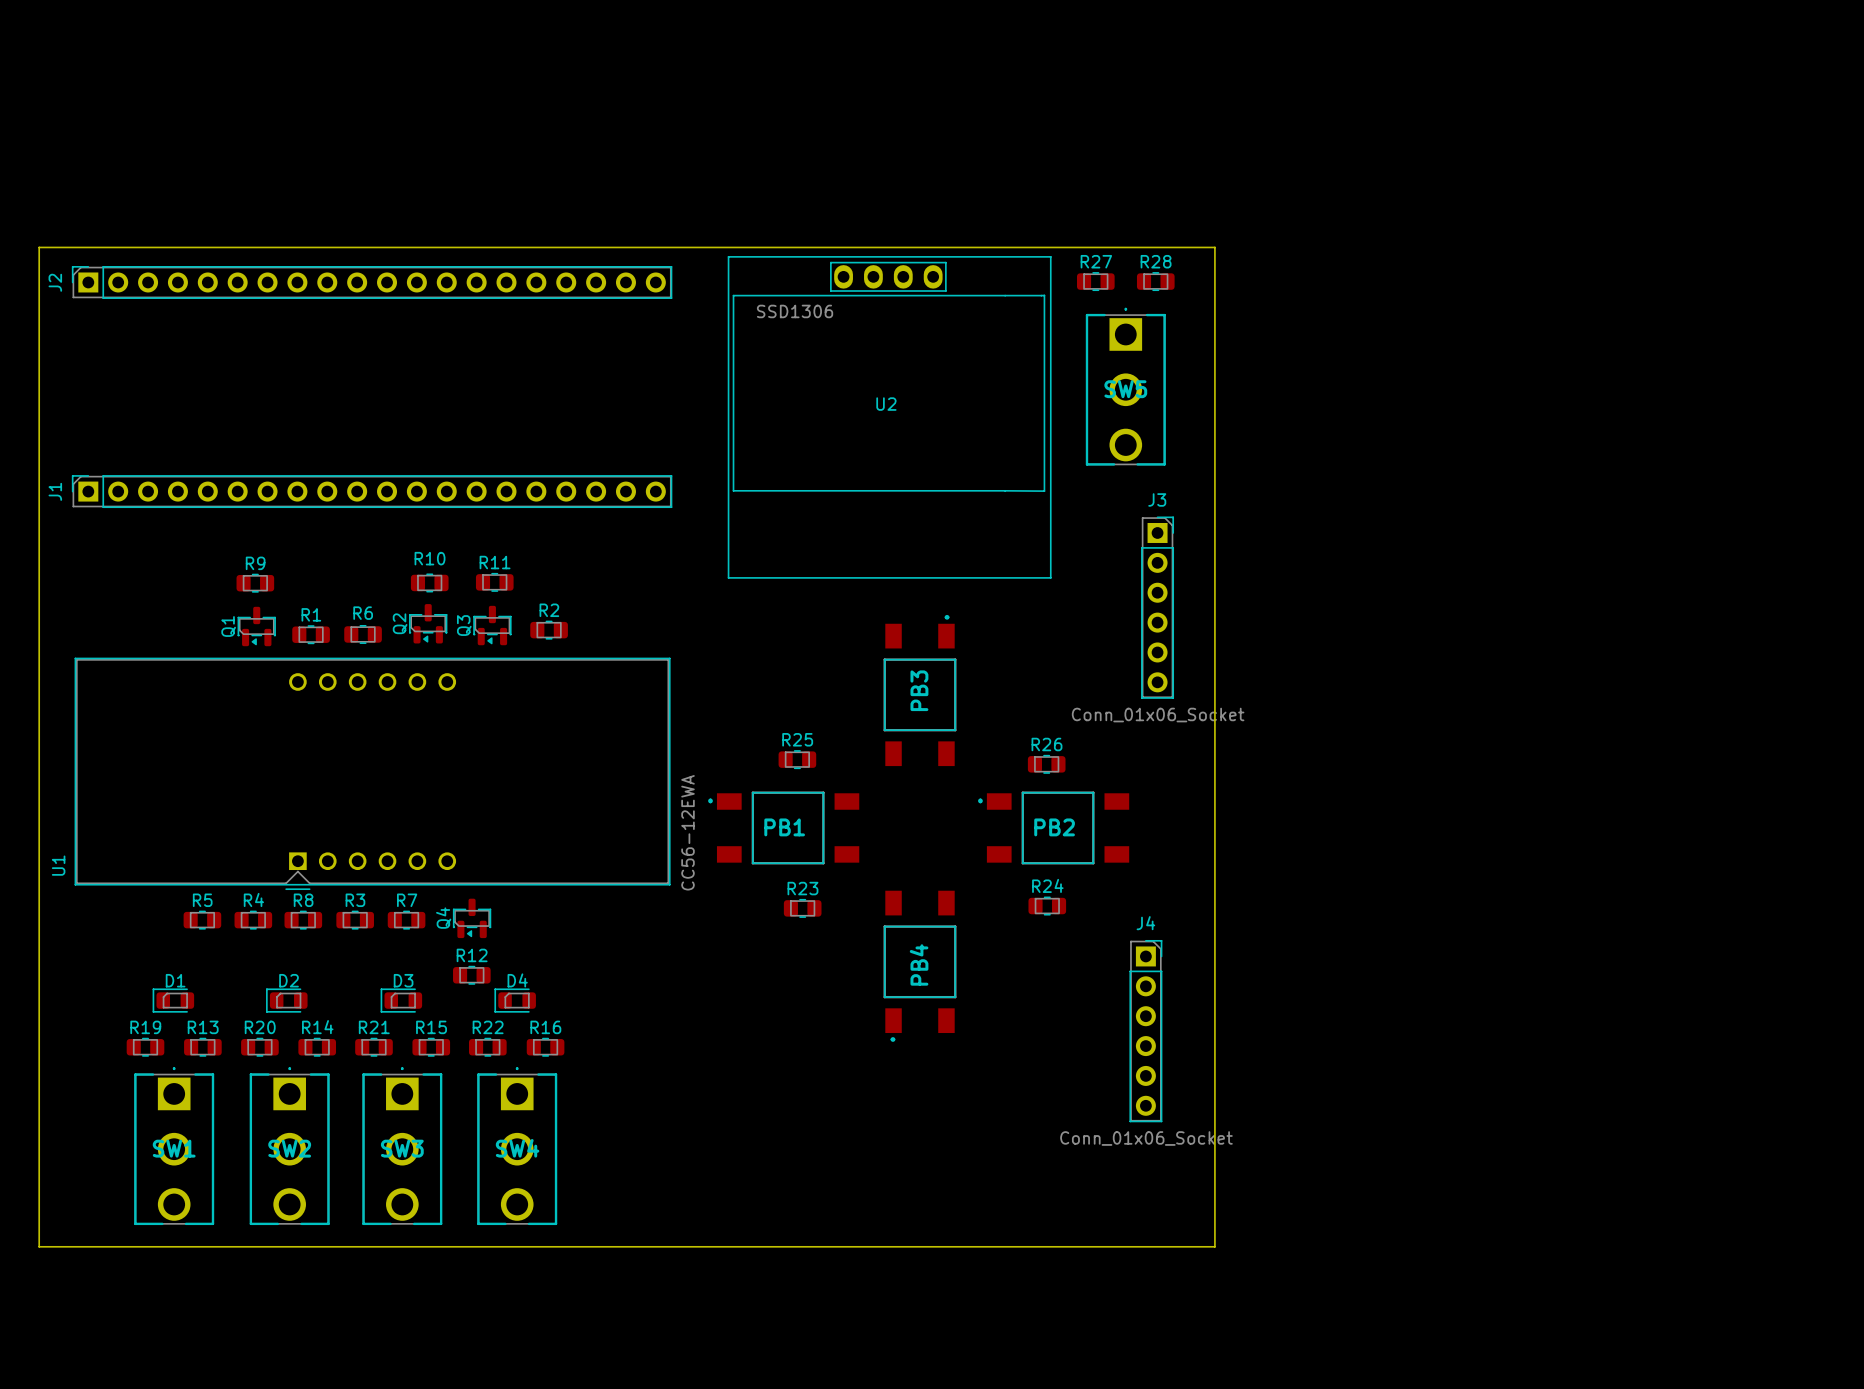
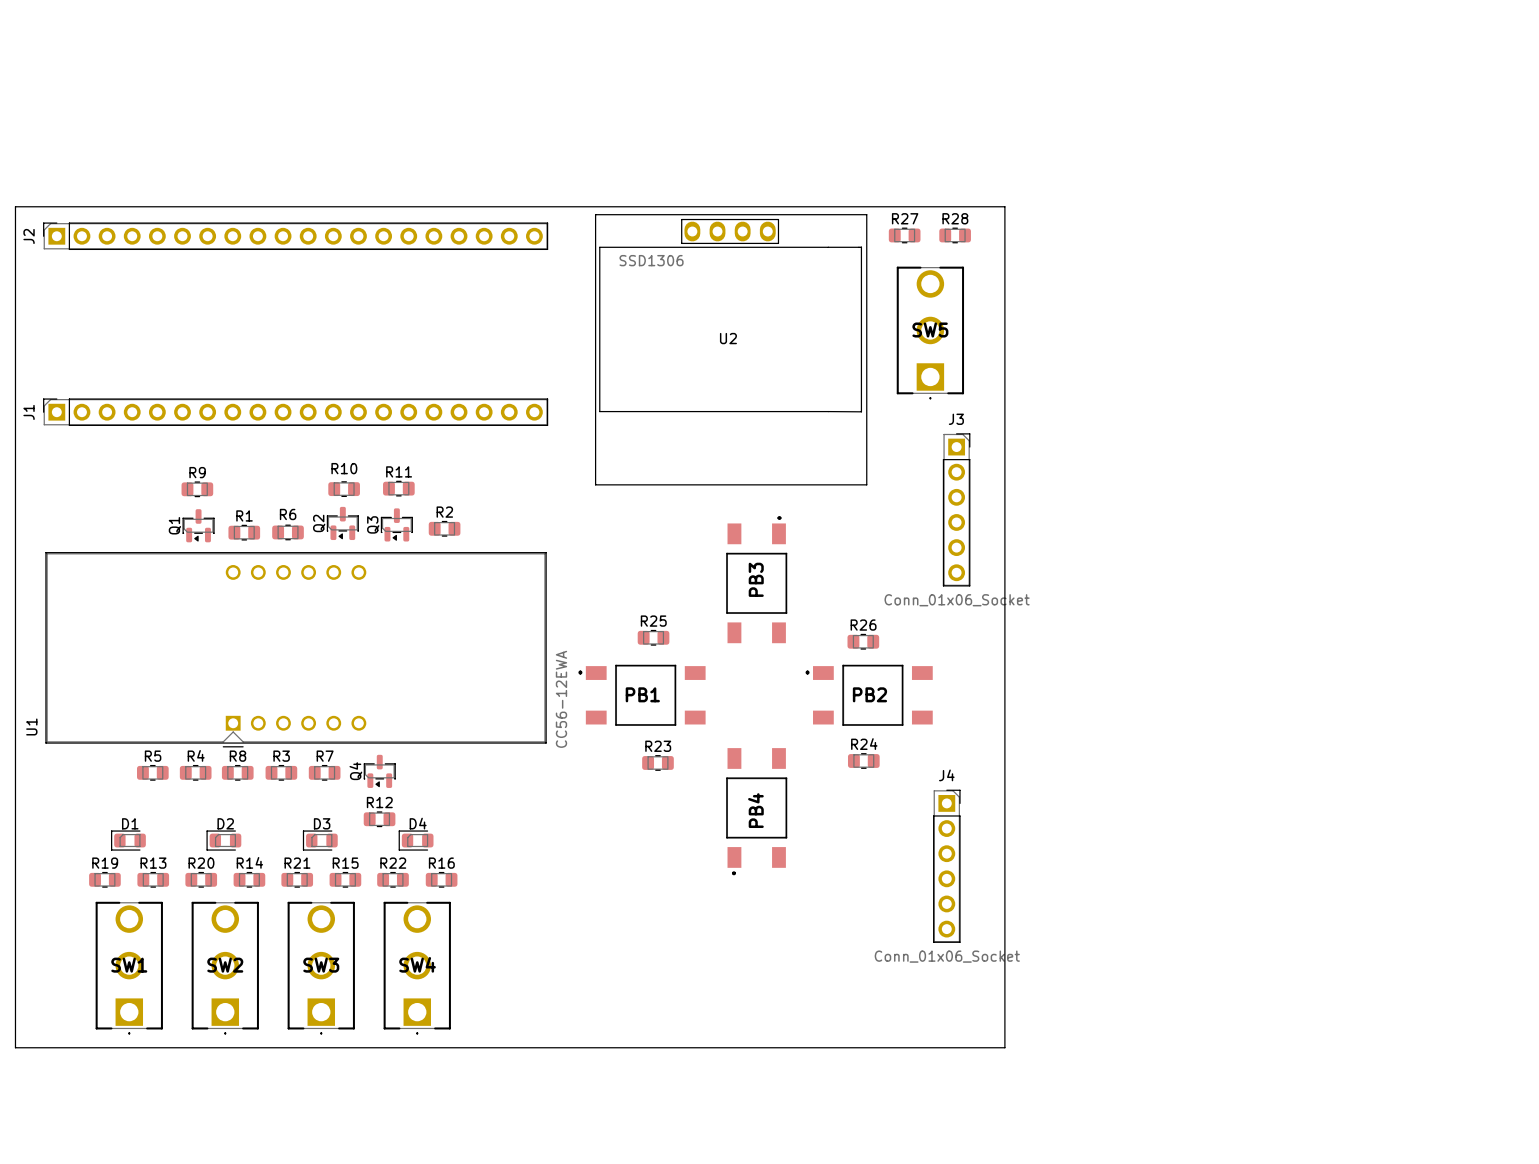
SW5 rotation: 0° (1125, 386) -> 180° (930, 332)
SW1 rotation: 0° (174, 1146) -> 180° (129, 968)
SW2 rotation: 0° (289, 1146) -> 180° (225, 968)
SW3 rotation: 0° (402, 1146) -> 180° (321, 968)
SW4 rotation: 0° (517, 1146) -> 180° (417, 968)

